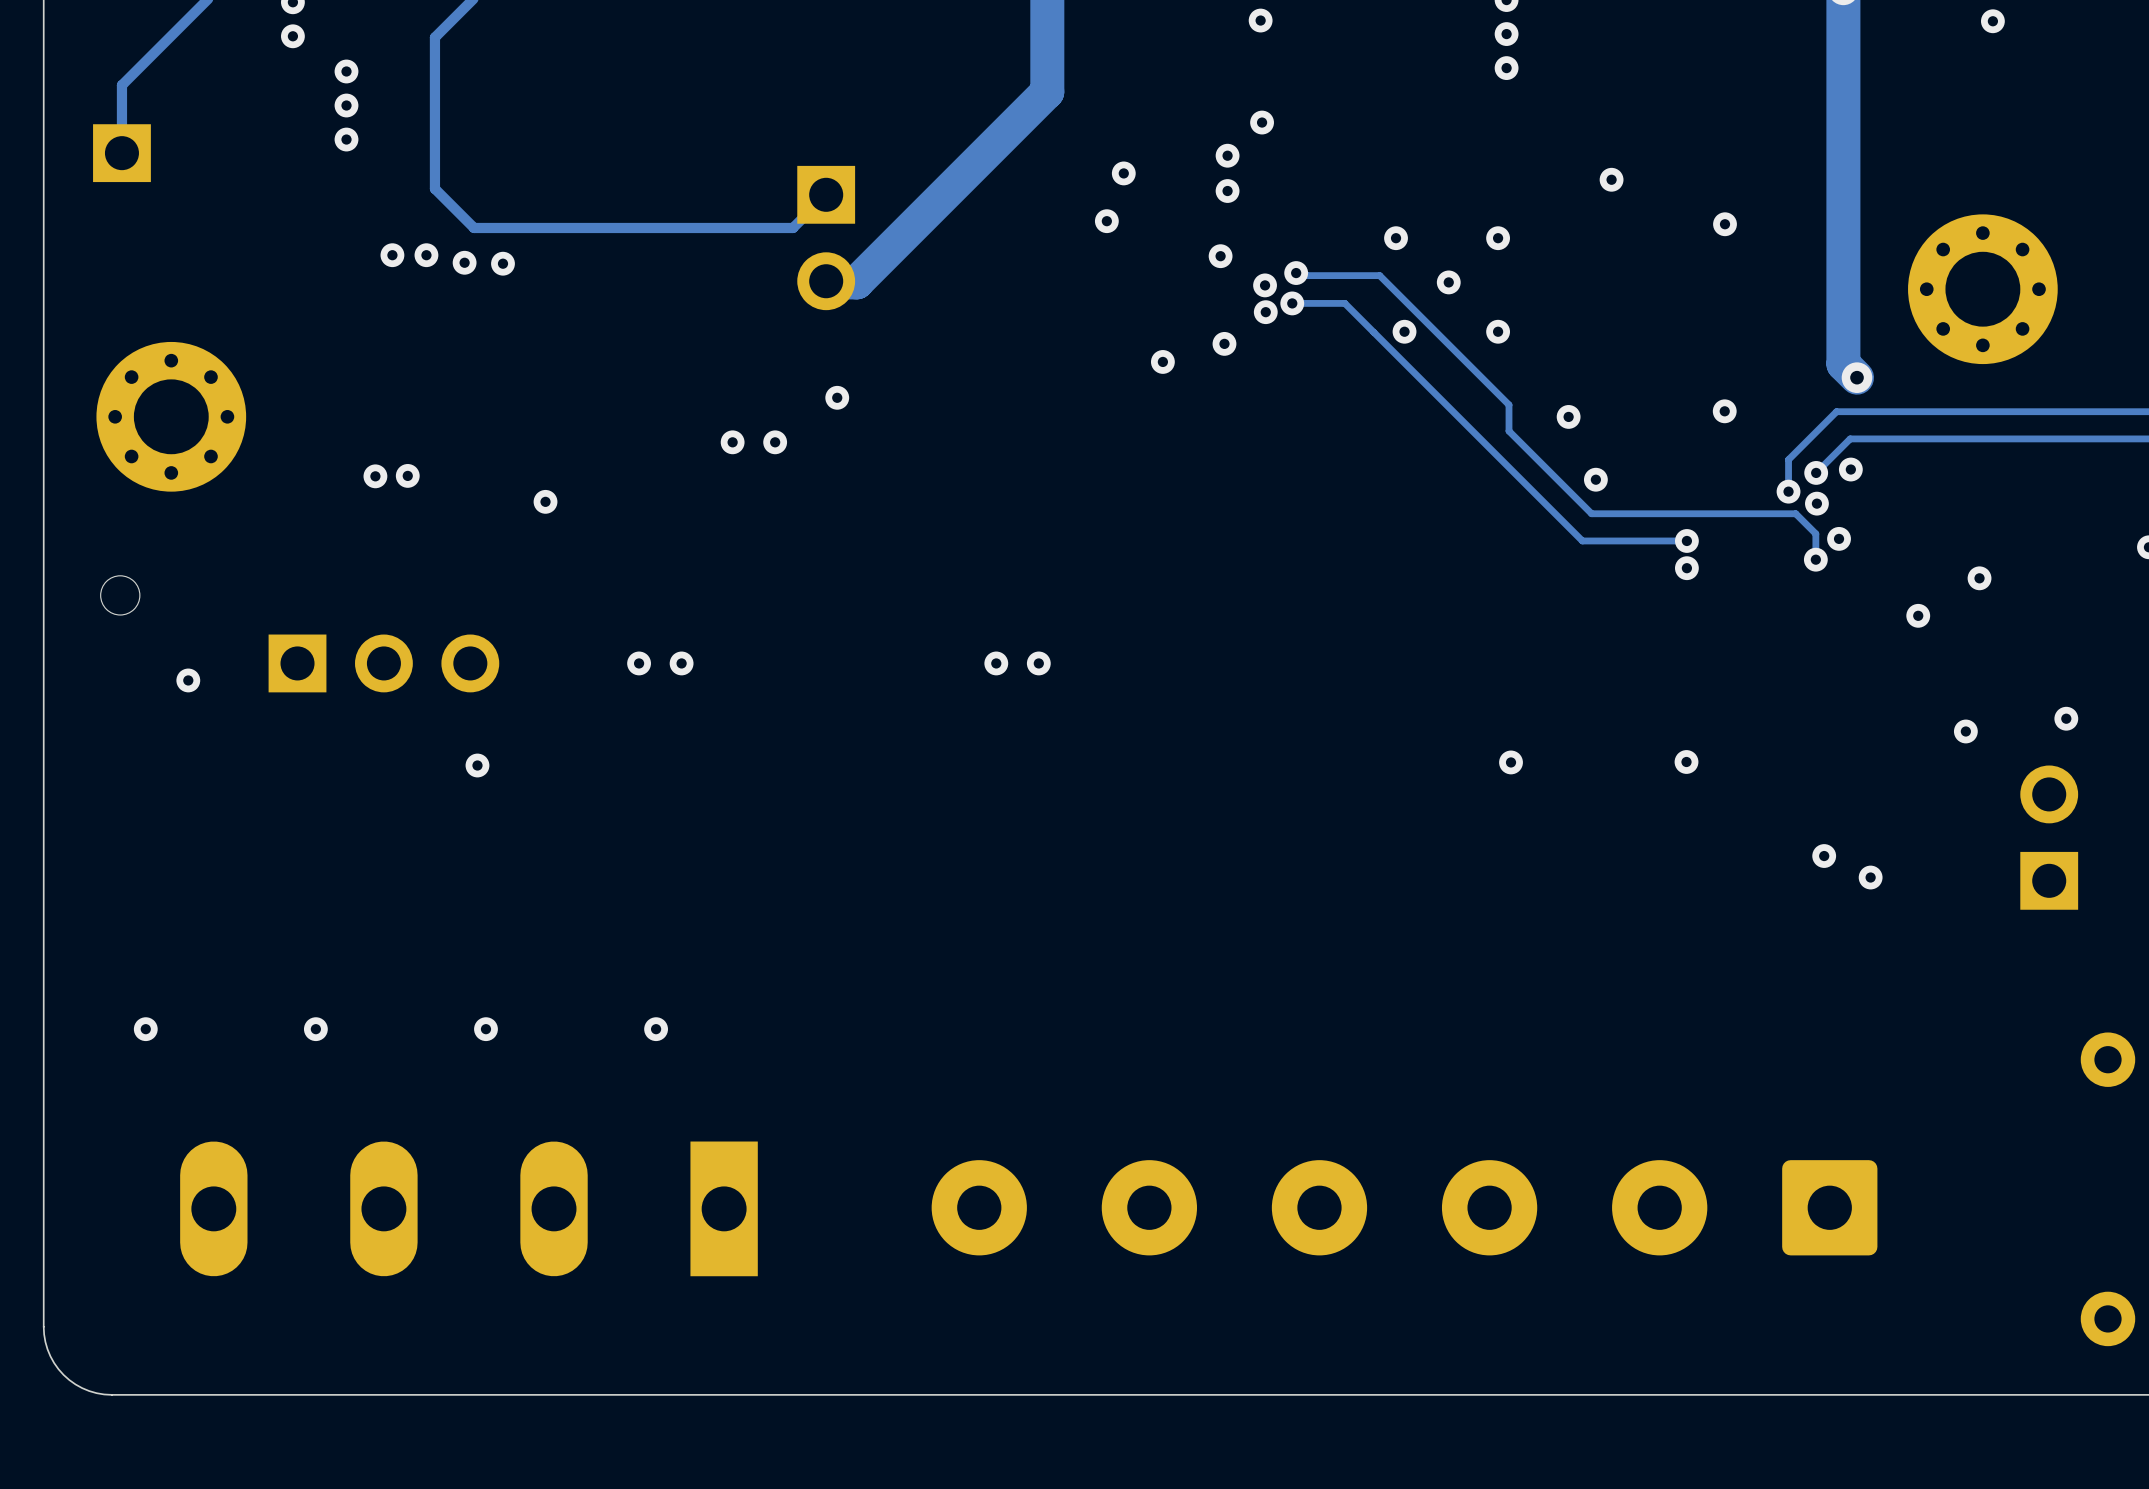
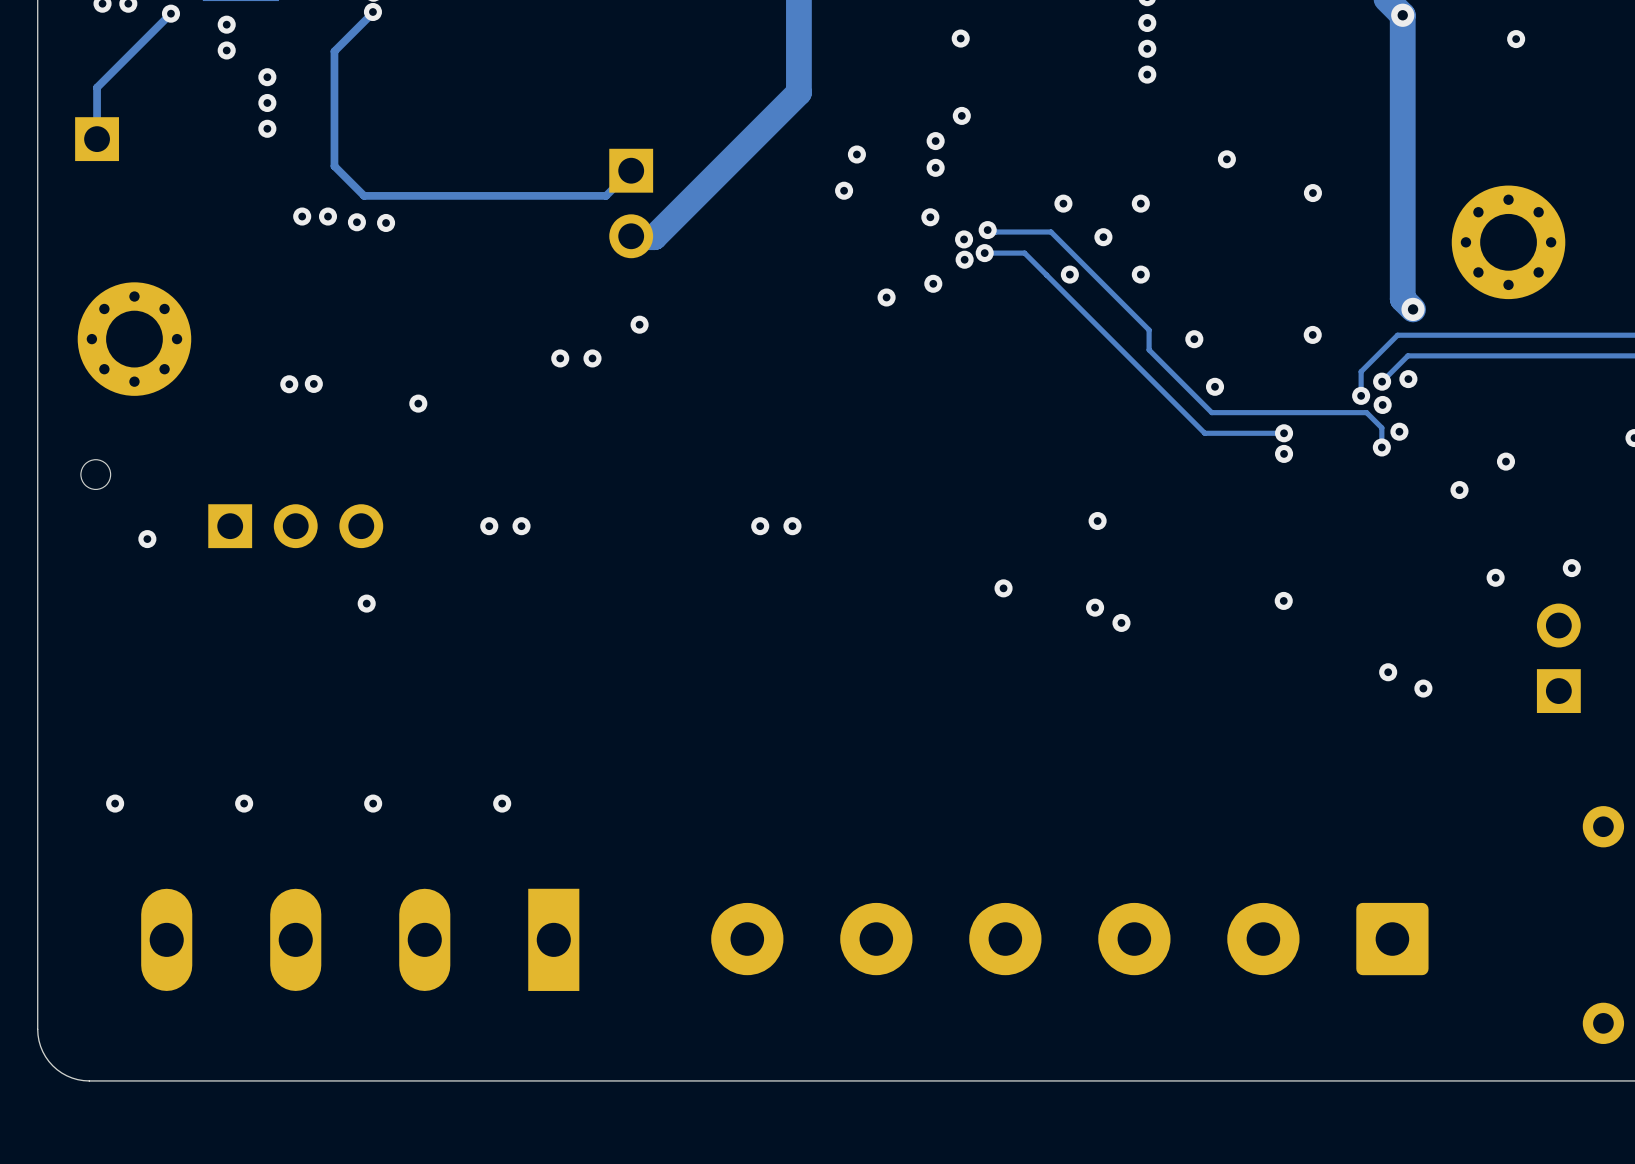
via: none -> (1097, 521)
via: none -> (1003, 588)
via: (1511, 762) -> none
via: none -> (1095, 607)
via: none -> (1121, 622)

